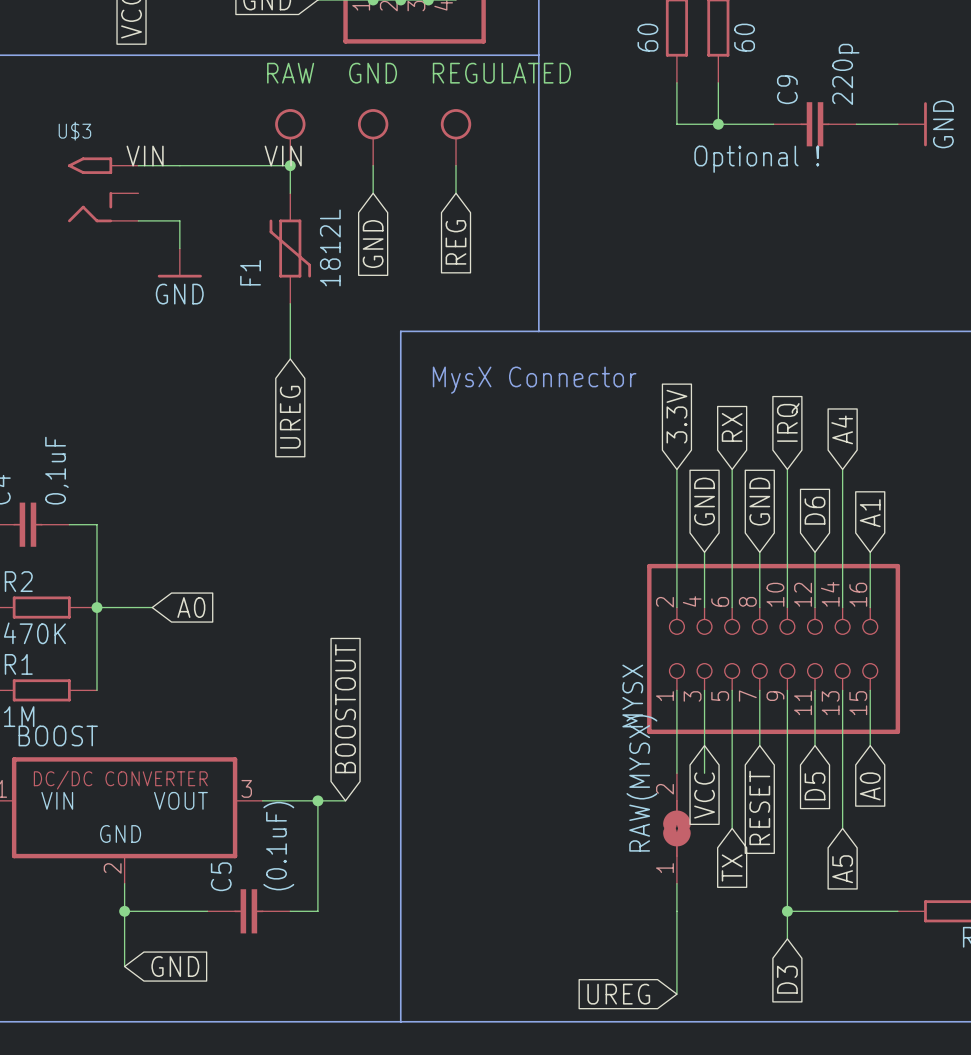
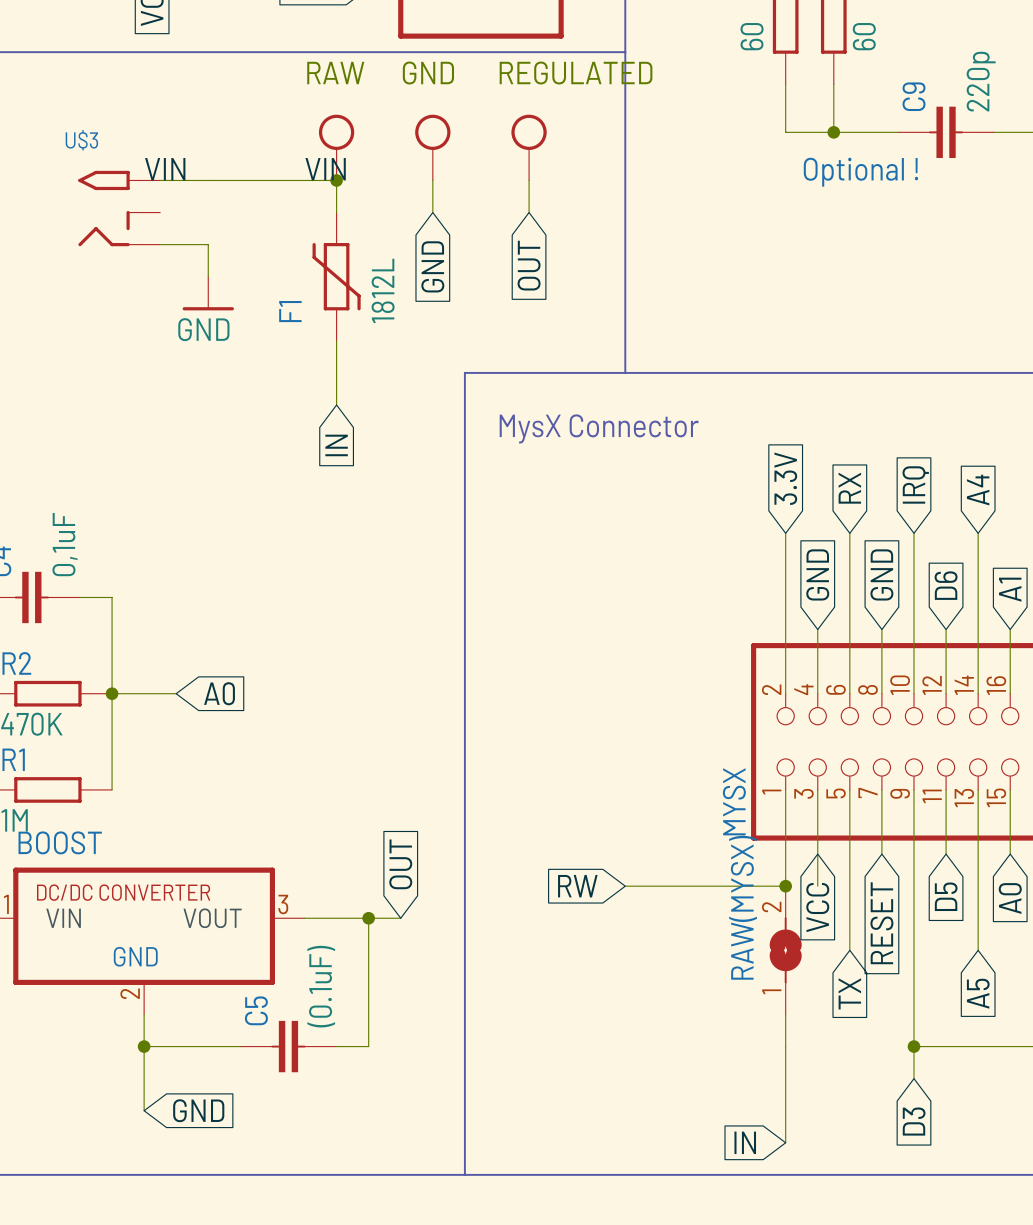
global label: REG (456, 242) -> OUT (529, 265)
global label: UREG (290, 417) -> IN (336, 445)
global label: BOOSTOUT (345, 708) -> OUT (400, 864)
global label: none -> RW (577, 886)
wire: none -> (625, 886) (785, 886)
junction: none -> (785, 886)
global label: UREG (618, 994) -> IN (745, 1142)

